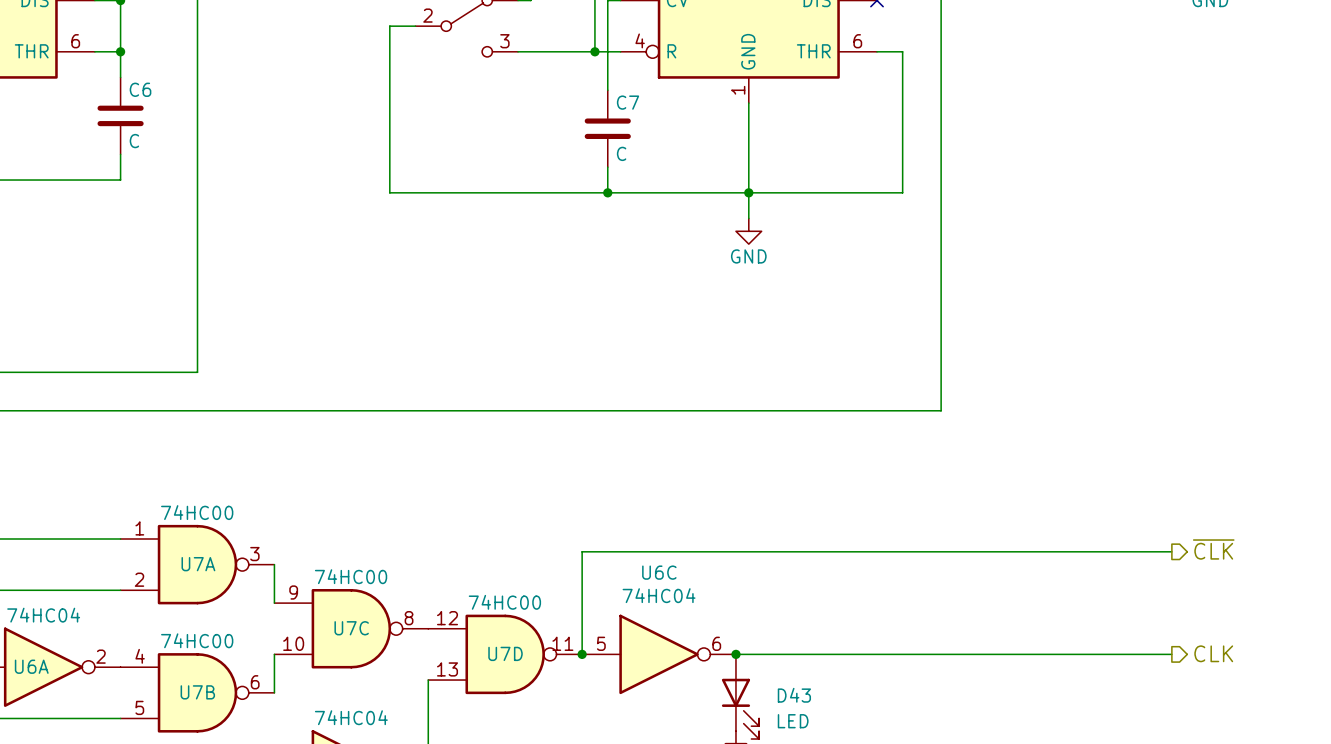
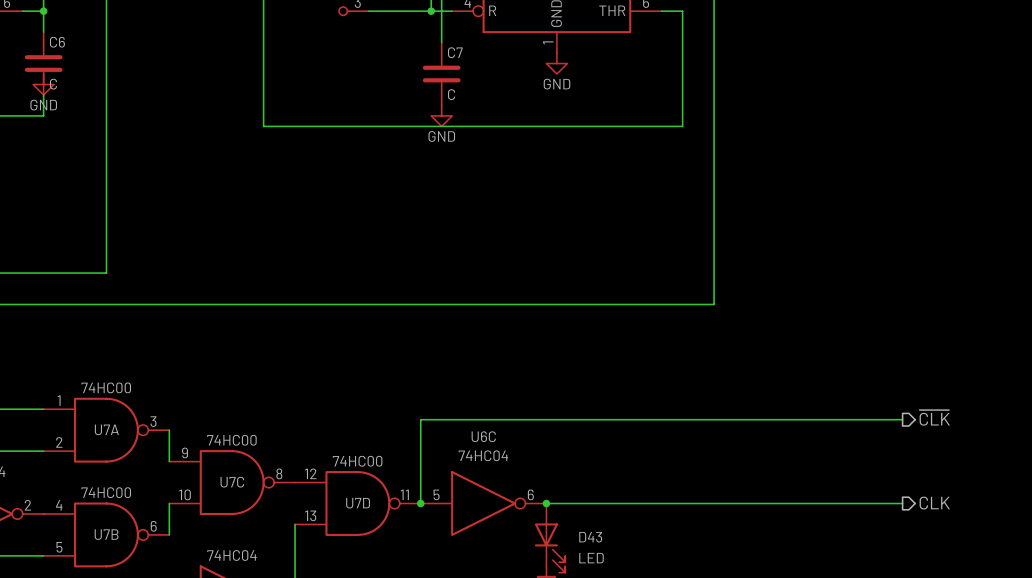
wire: (748, 103) (748, 218) -> none
power symbol: none -> GND (556, 63)
power symbol: none -> GND (43, 84)
power symbol: none -> GND (441, 115)
junction: (607, 192) -> none
junction: (748, 192) -> none
power symbol: GND (748, 231) -> none

